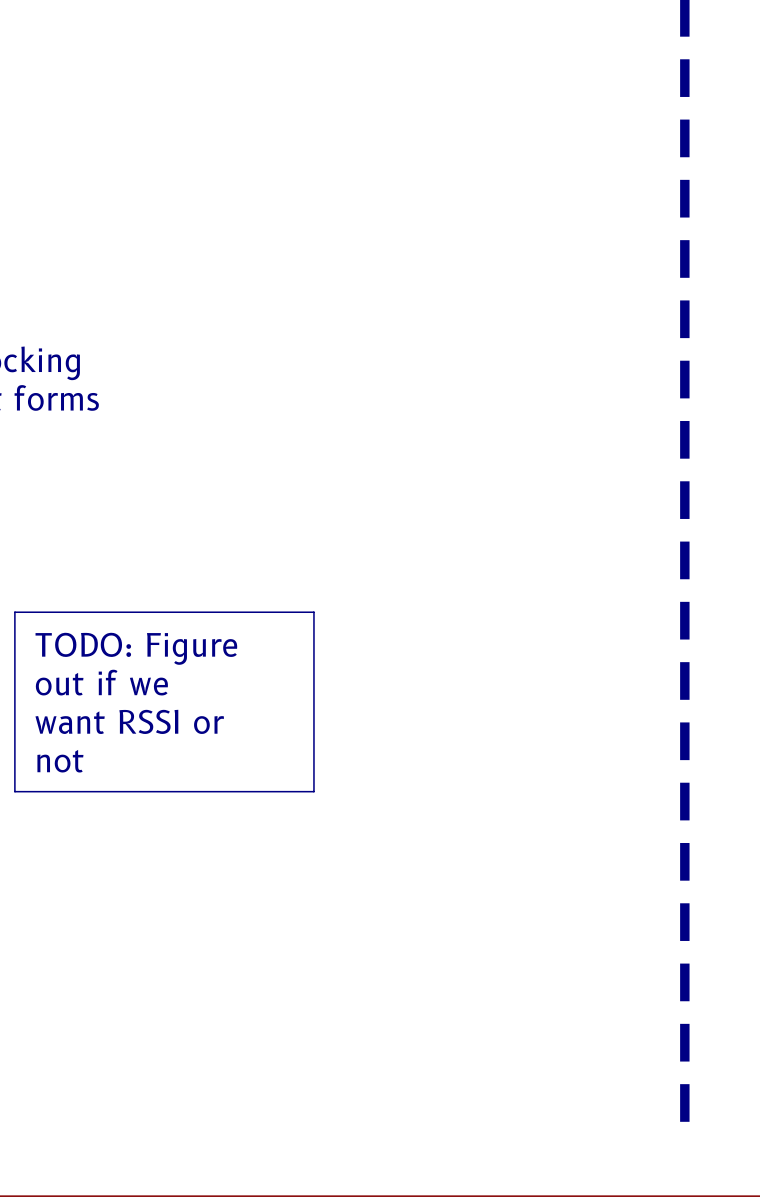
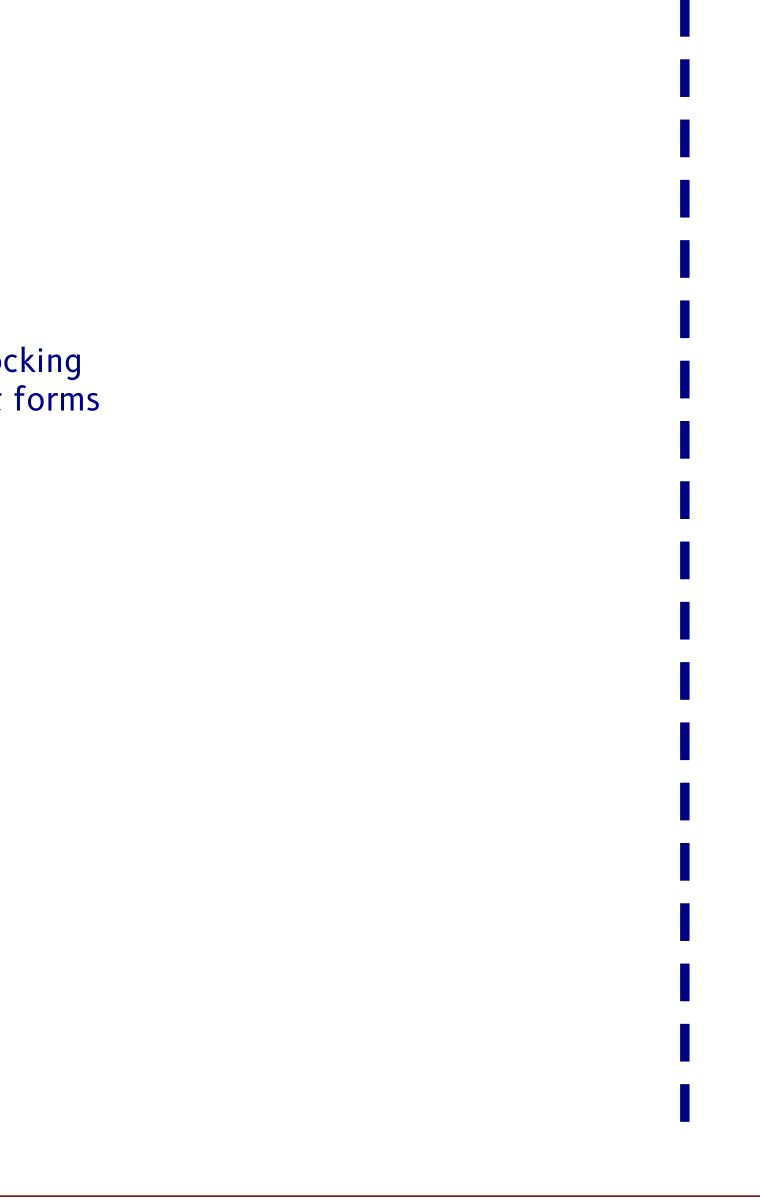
line: (14, 612) (313, 612) (313, 791) (14, 791) (14, 612) -> none
text: TODO: Figure (136, 648) -> none
text: out if we (101, 682) -> none
text: want RSSI or (129, 721) -> none
text: not (60, 761) -> none

